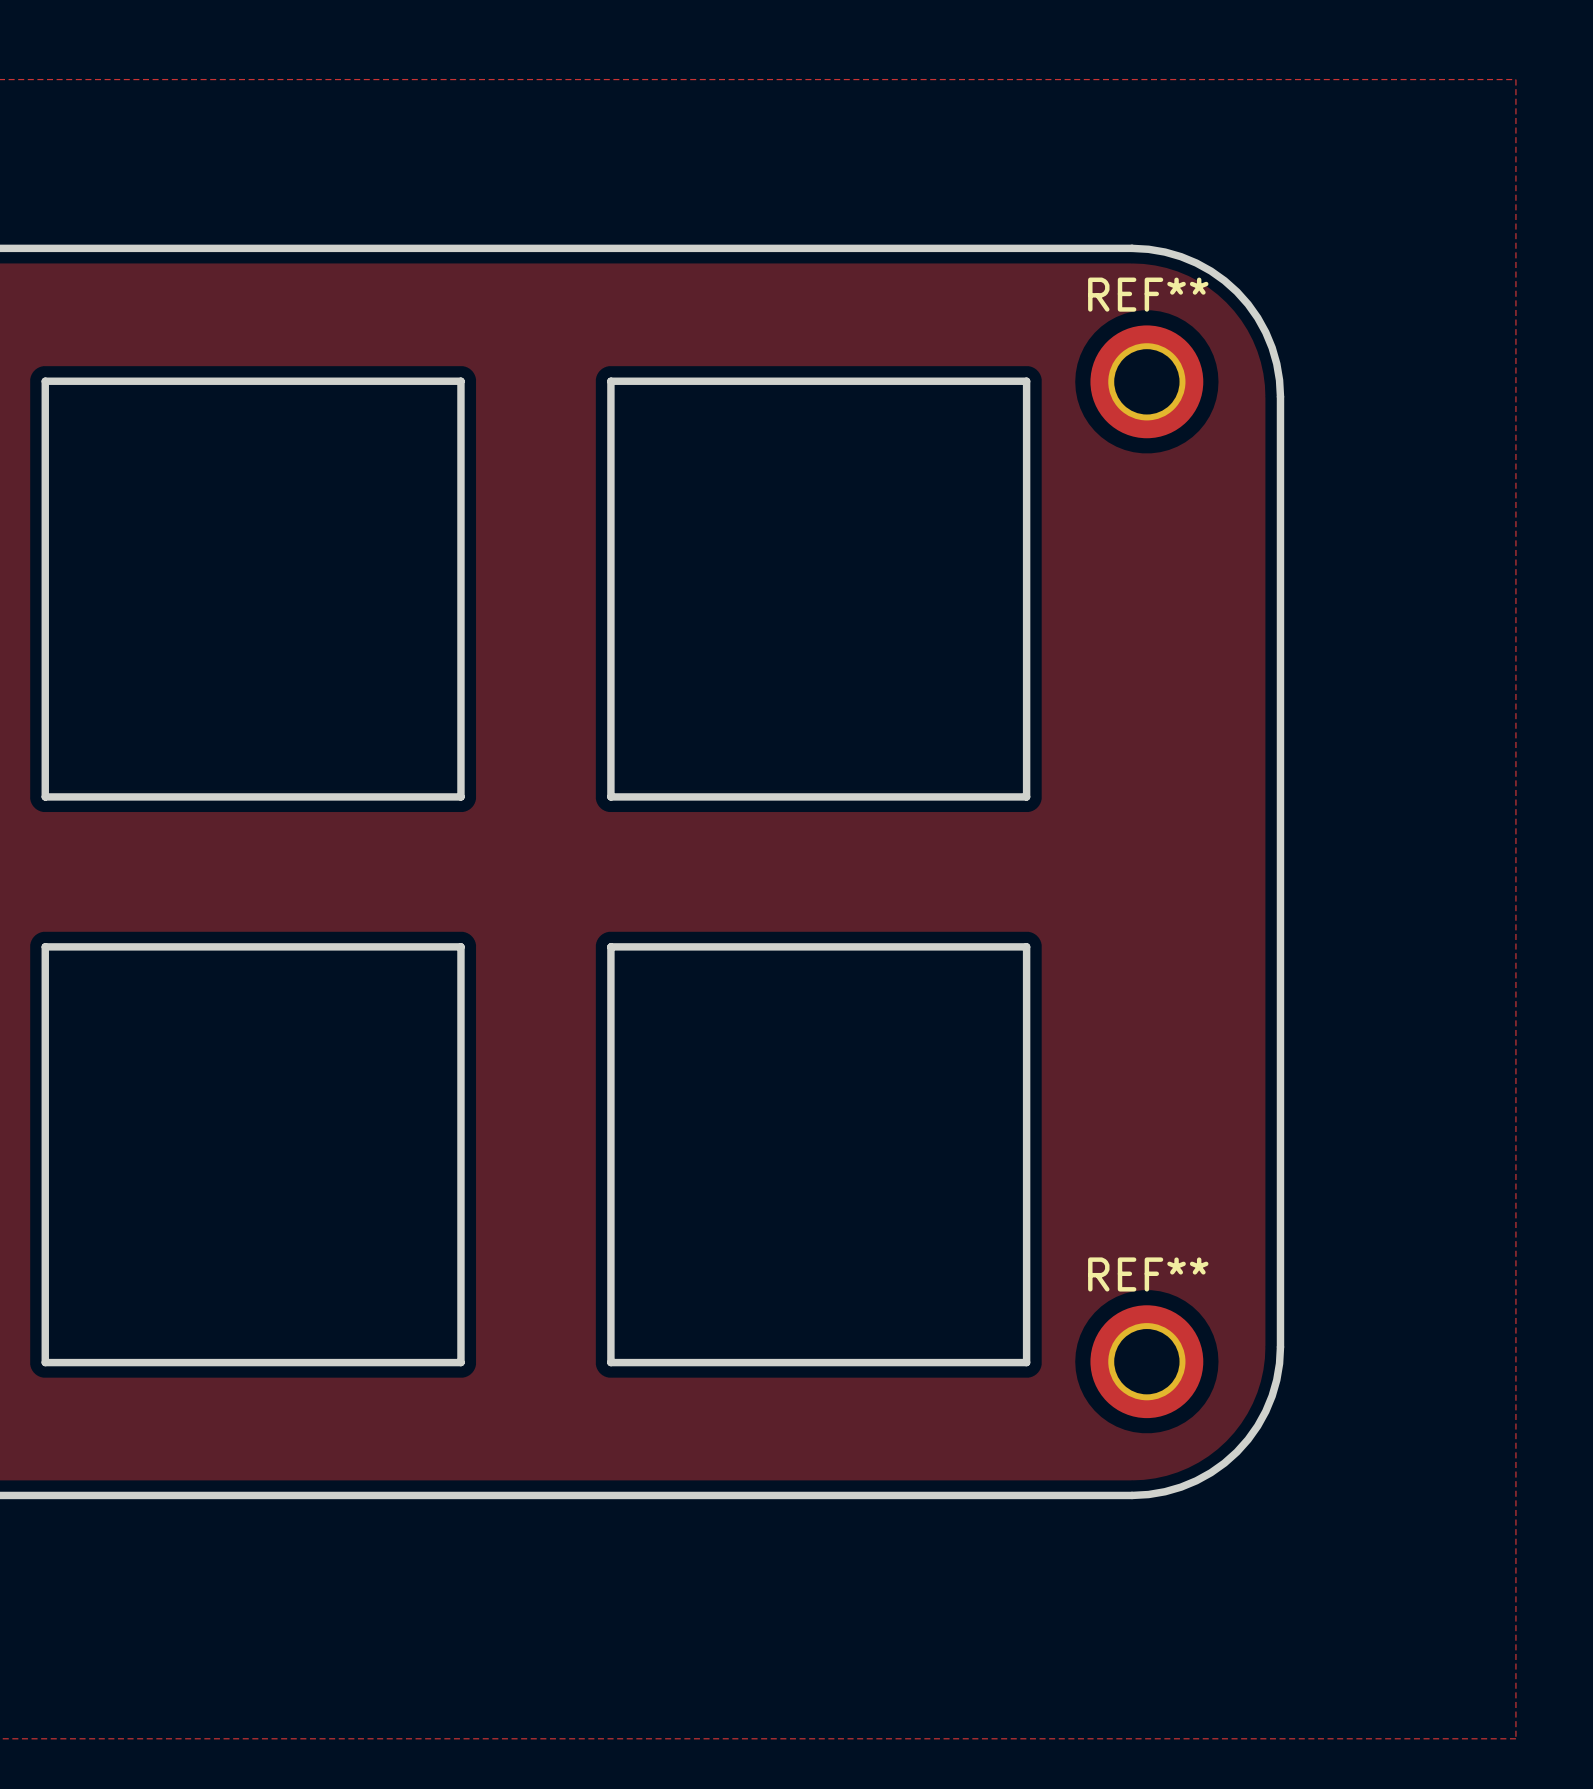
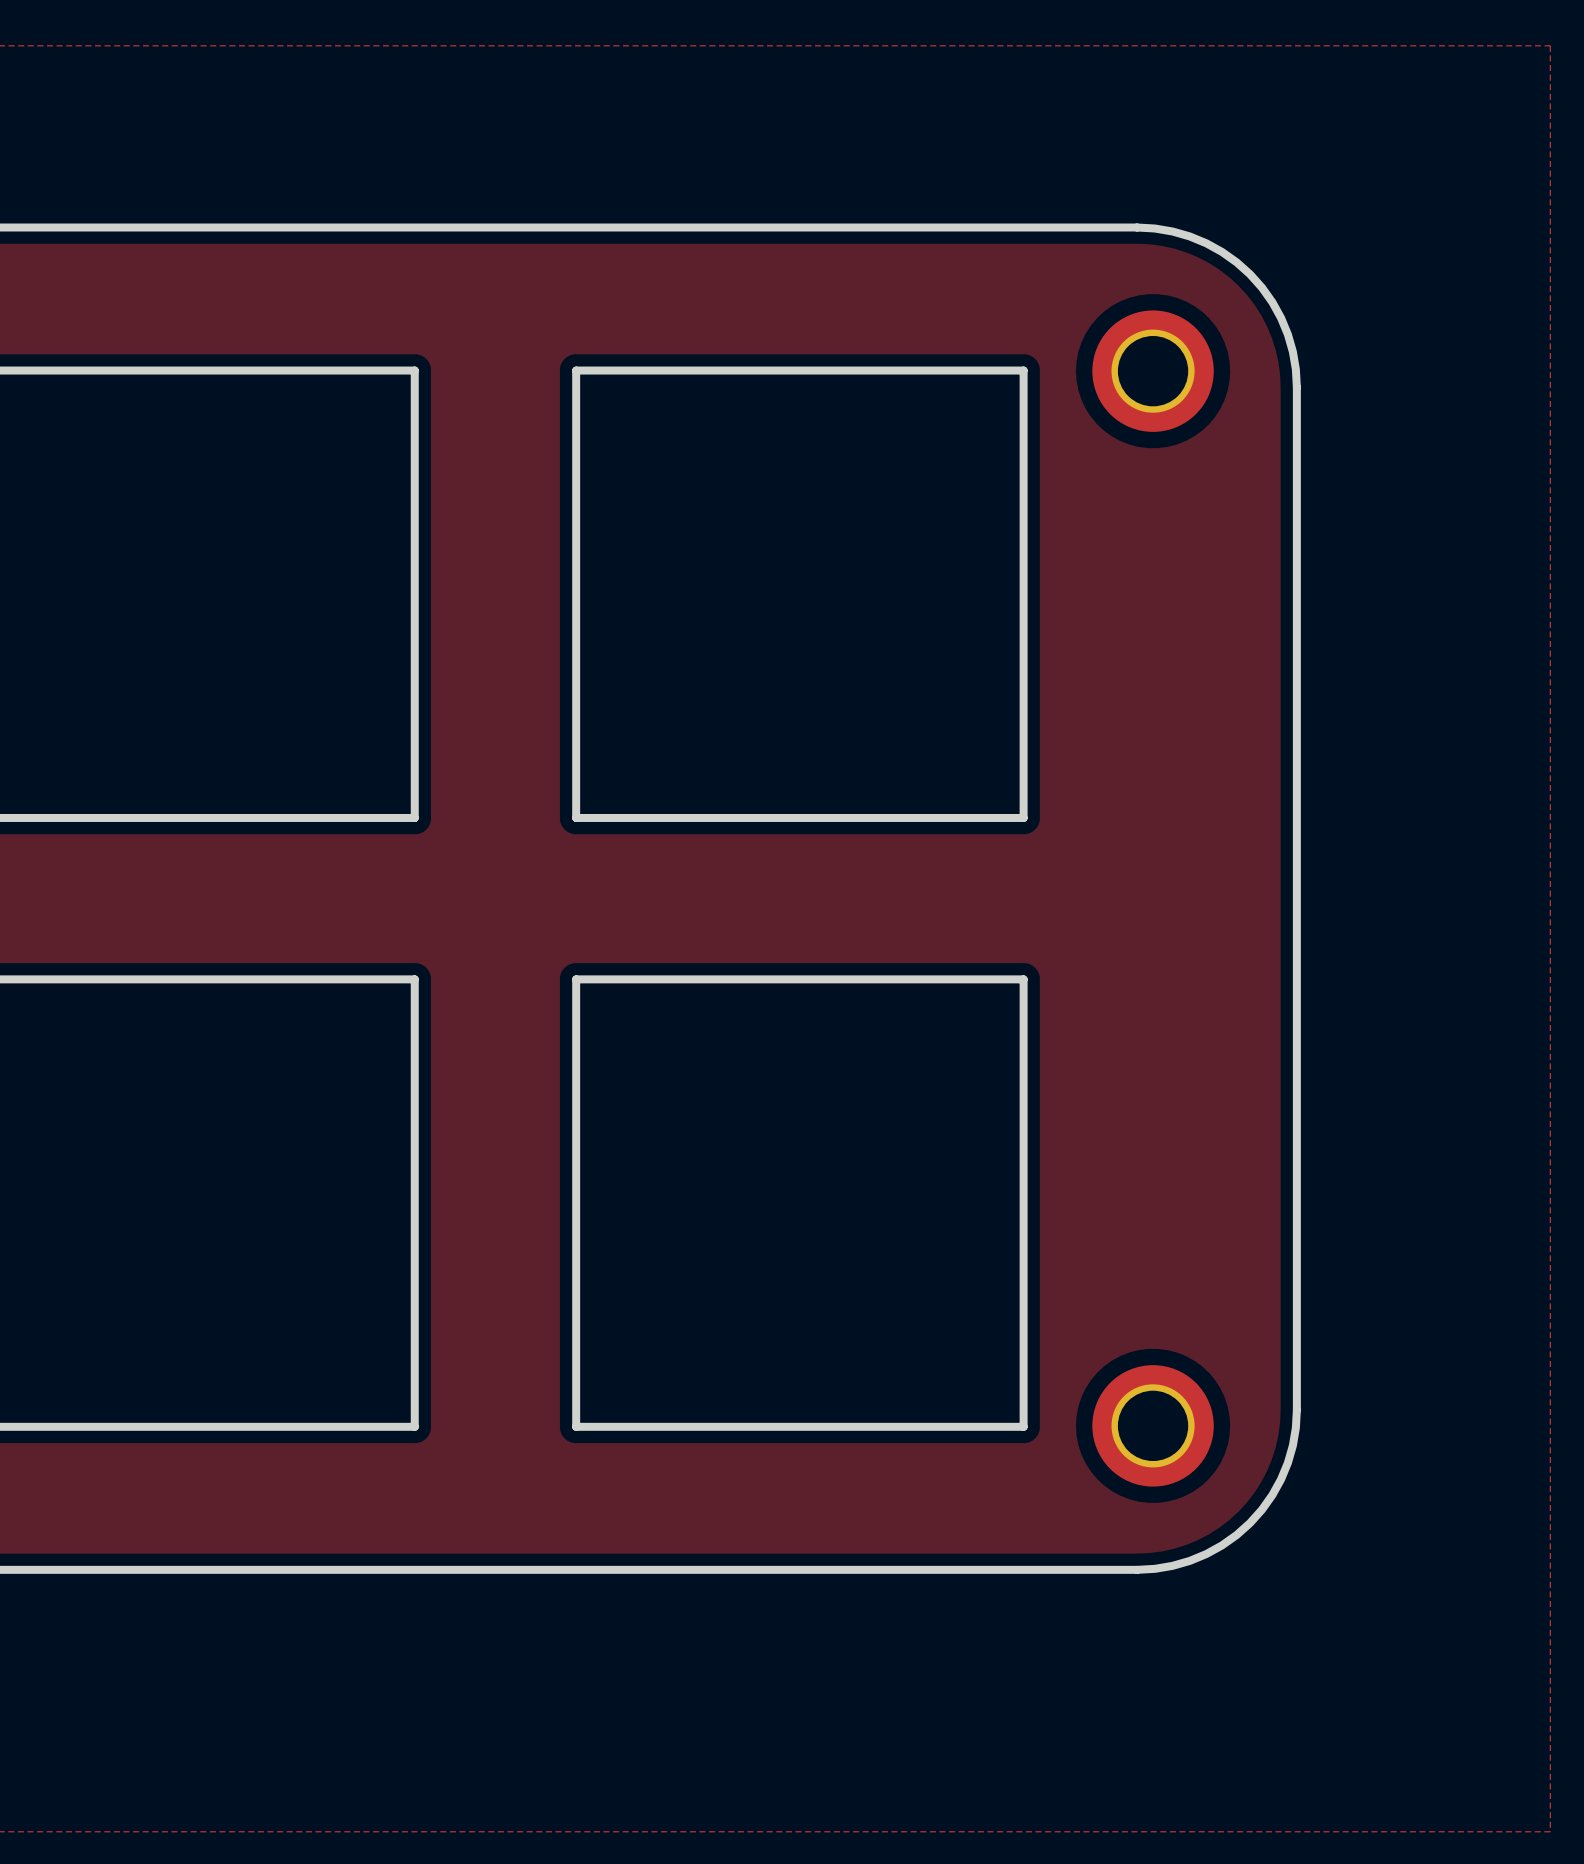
REF** name: REF** (1148, 294) -> none
REF** name: REF** (1148, 1274) -> none

